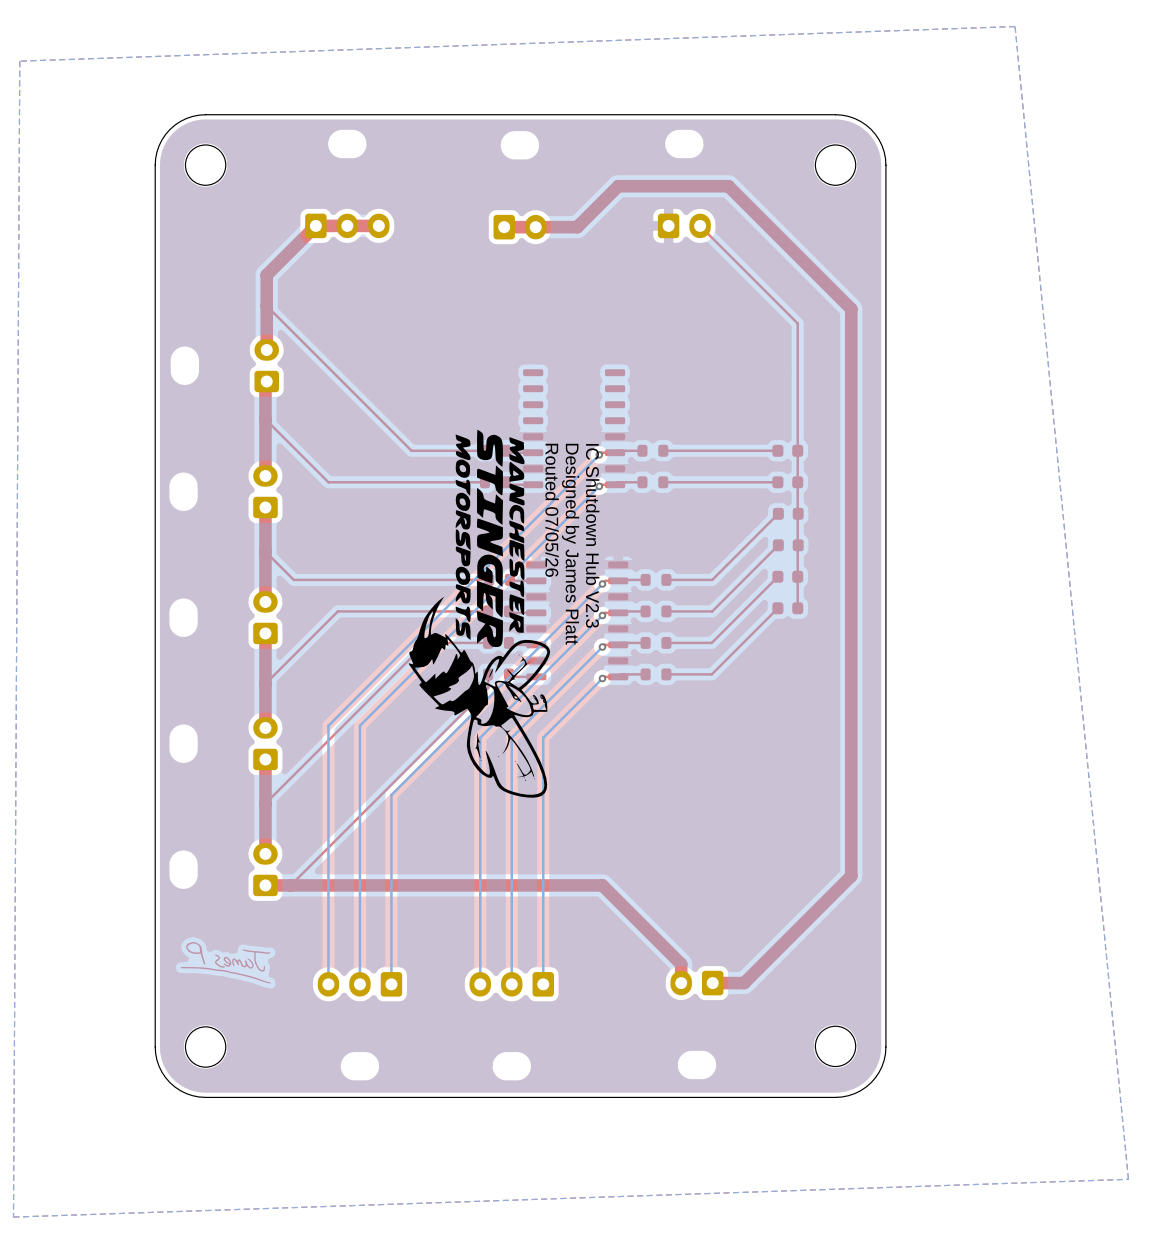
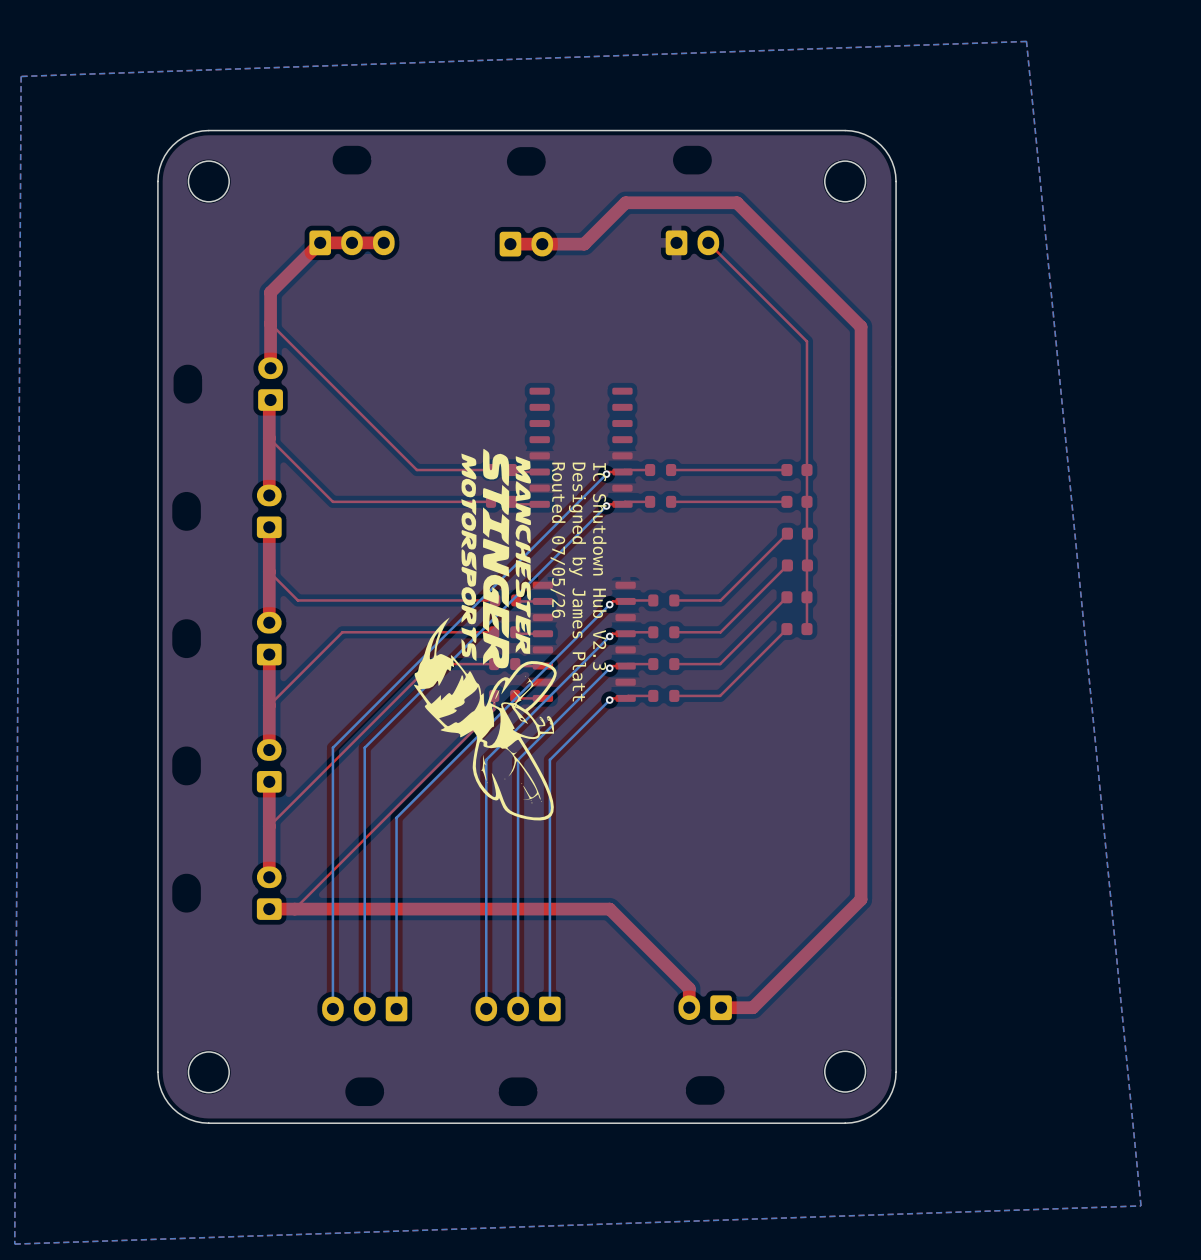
drawing: [180, 941, 271, 984] -> none

